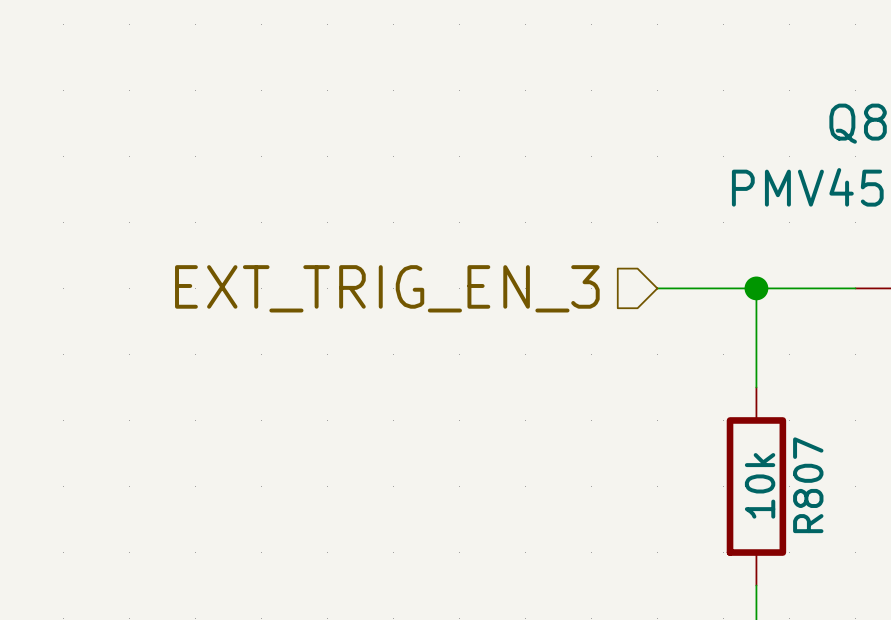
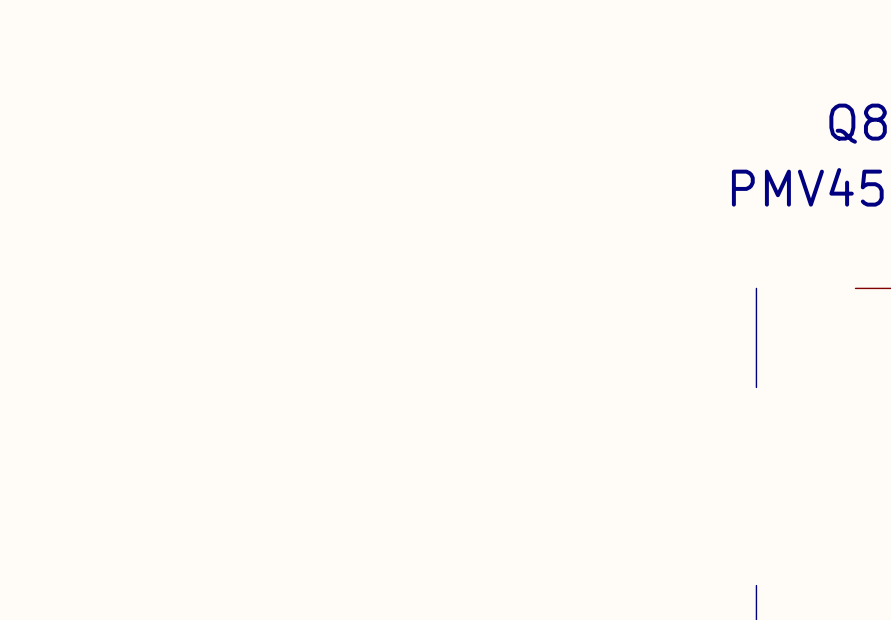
hierarchical label: EXT_TRIG_EN_3 (387, 288) -> none
wire: (657, 288) (855, 288) -> none
junction: (756, 288) -> none
R807: 10k (756, 486) -> none

